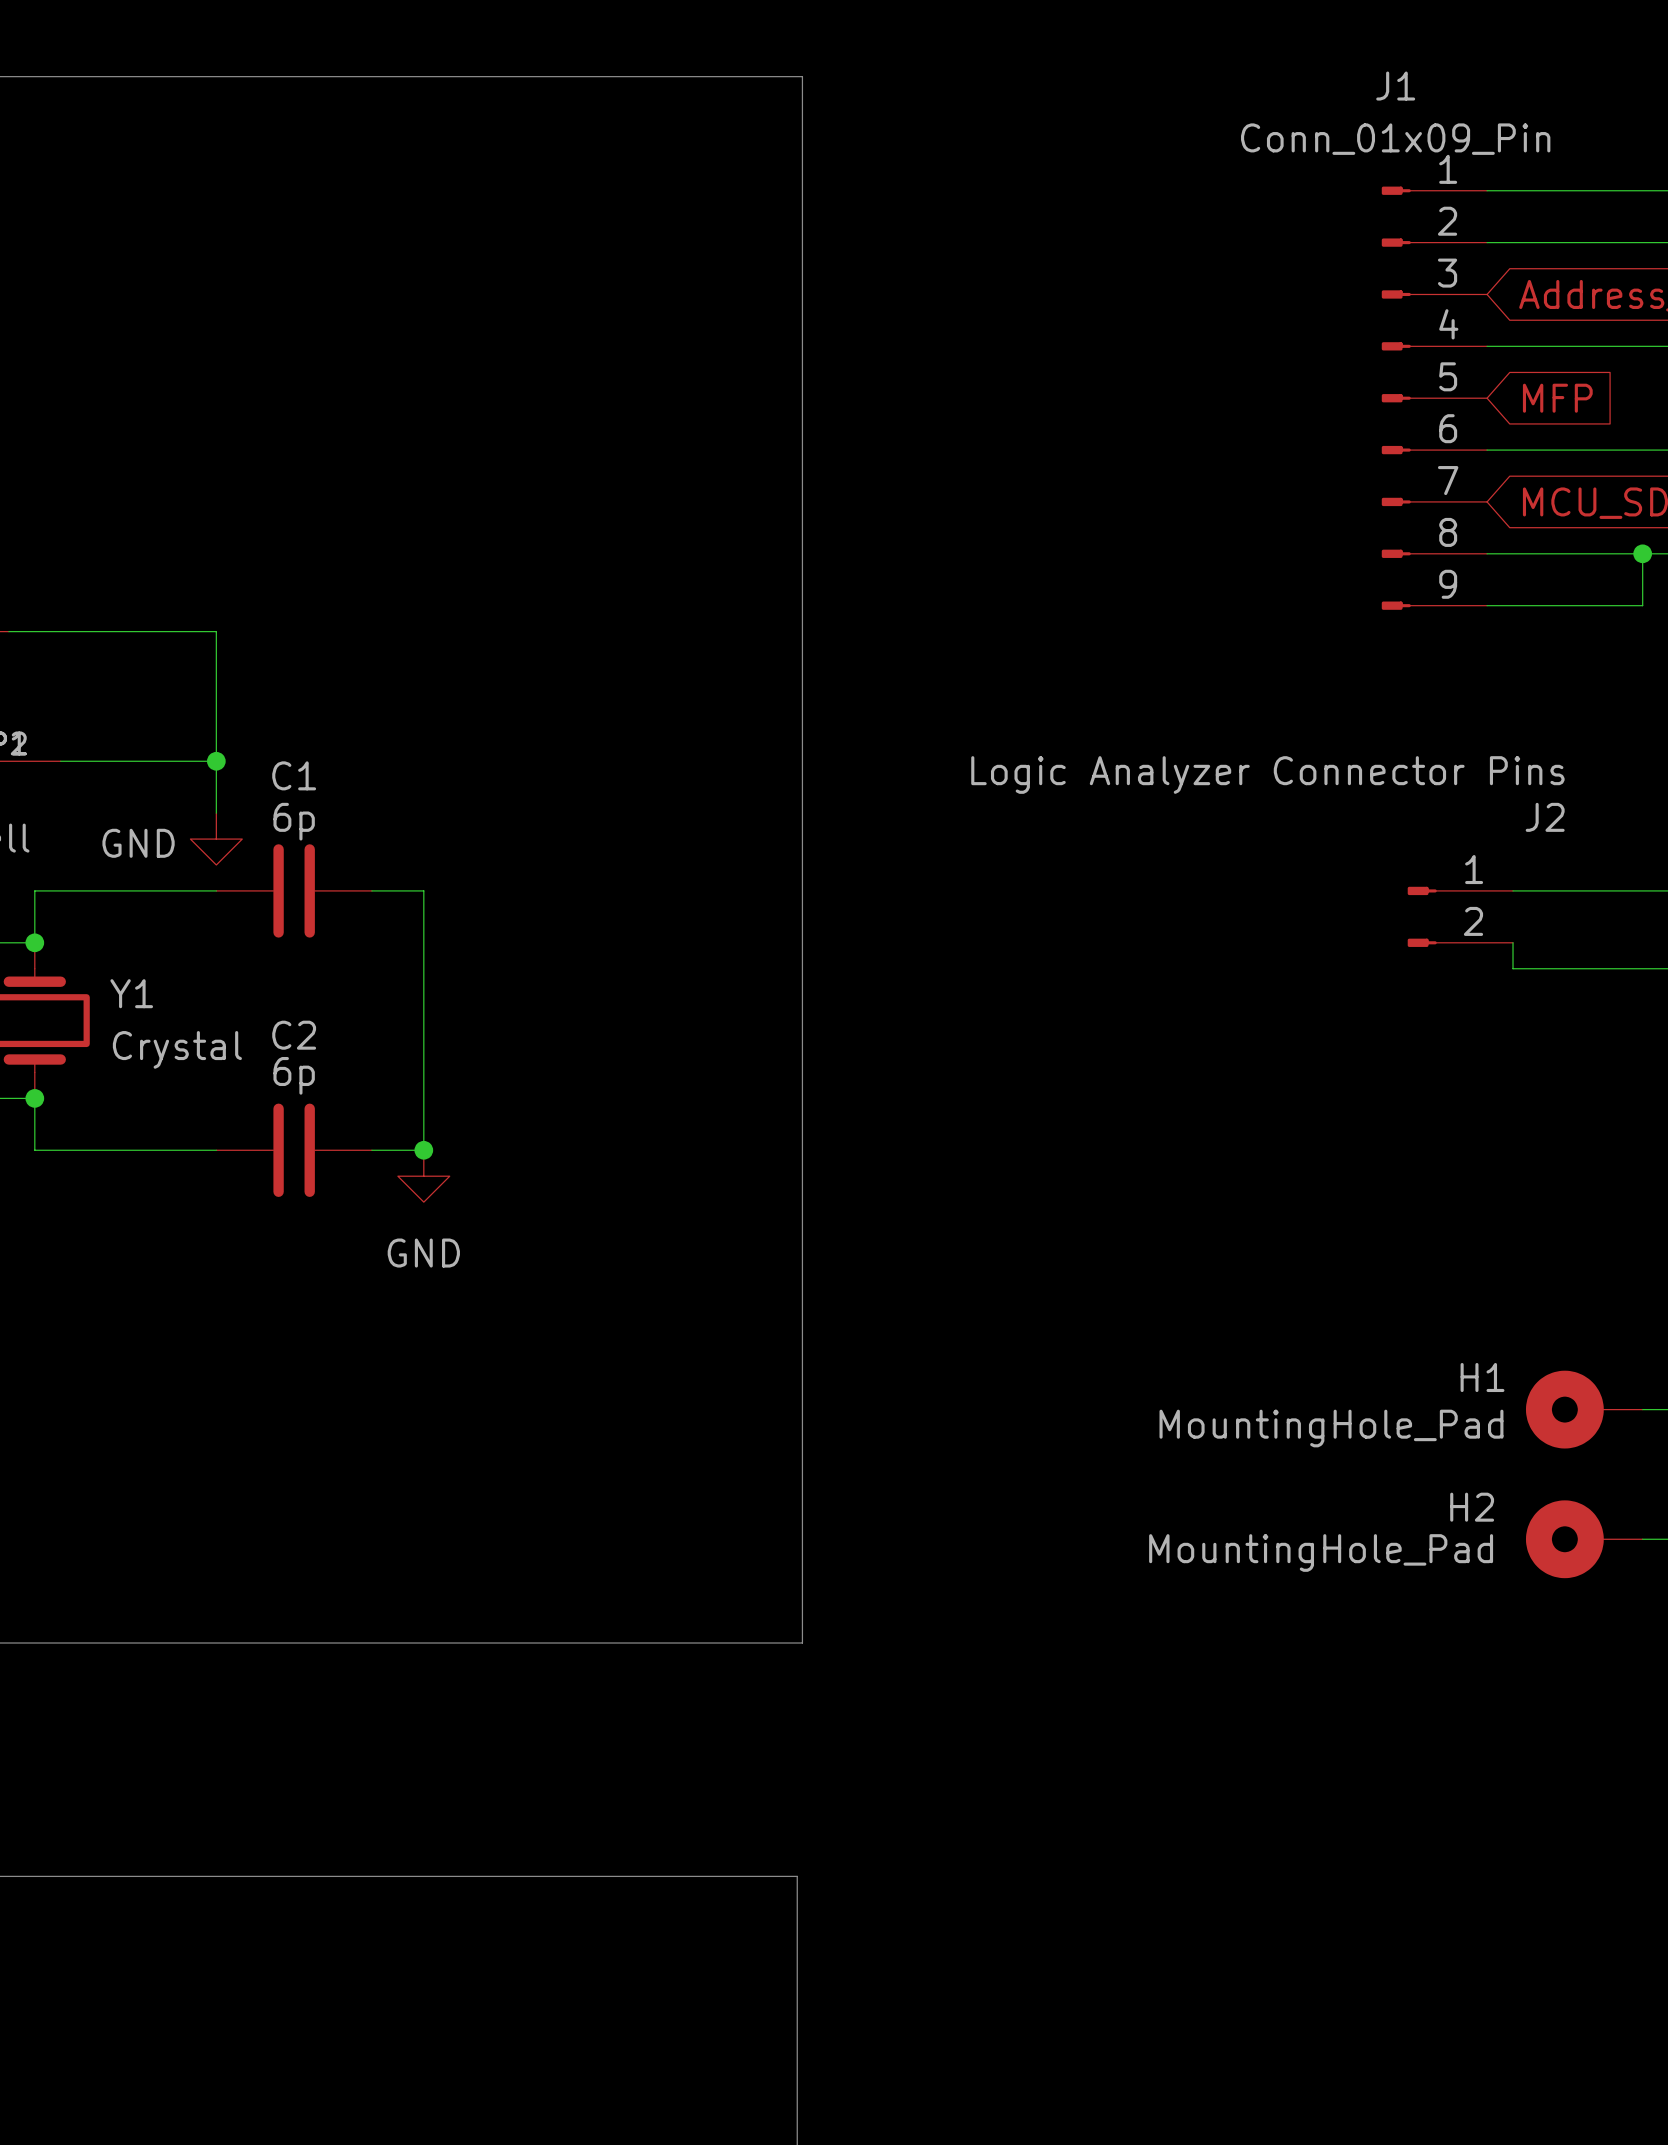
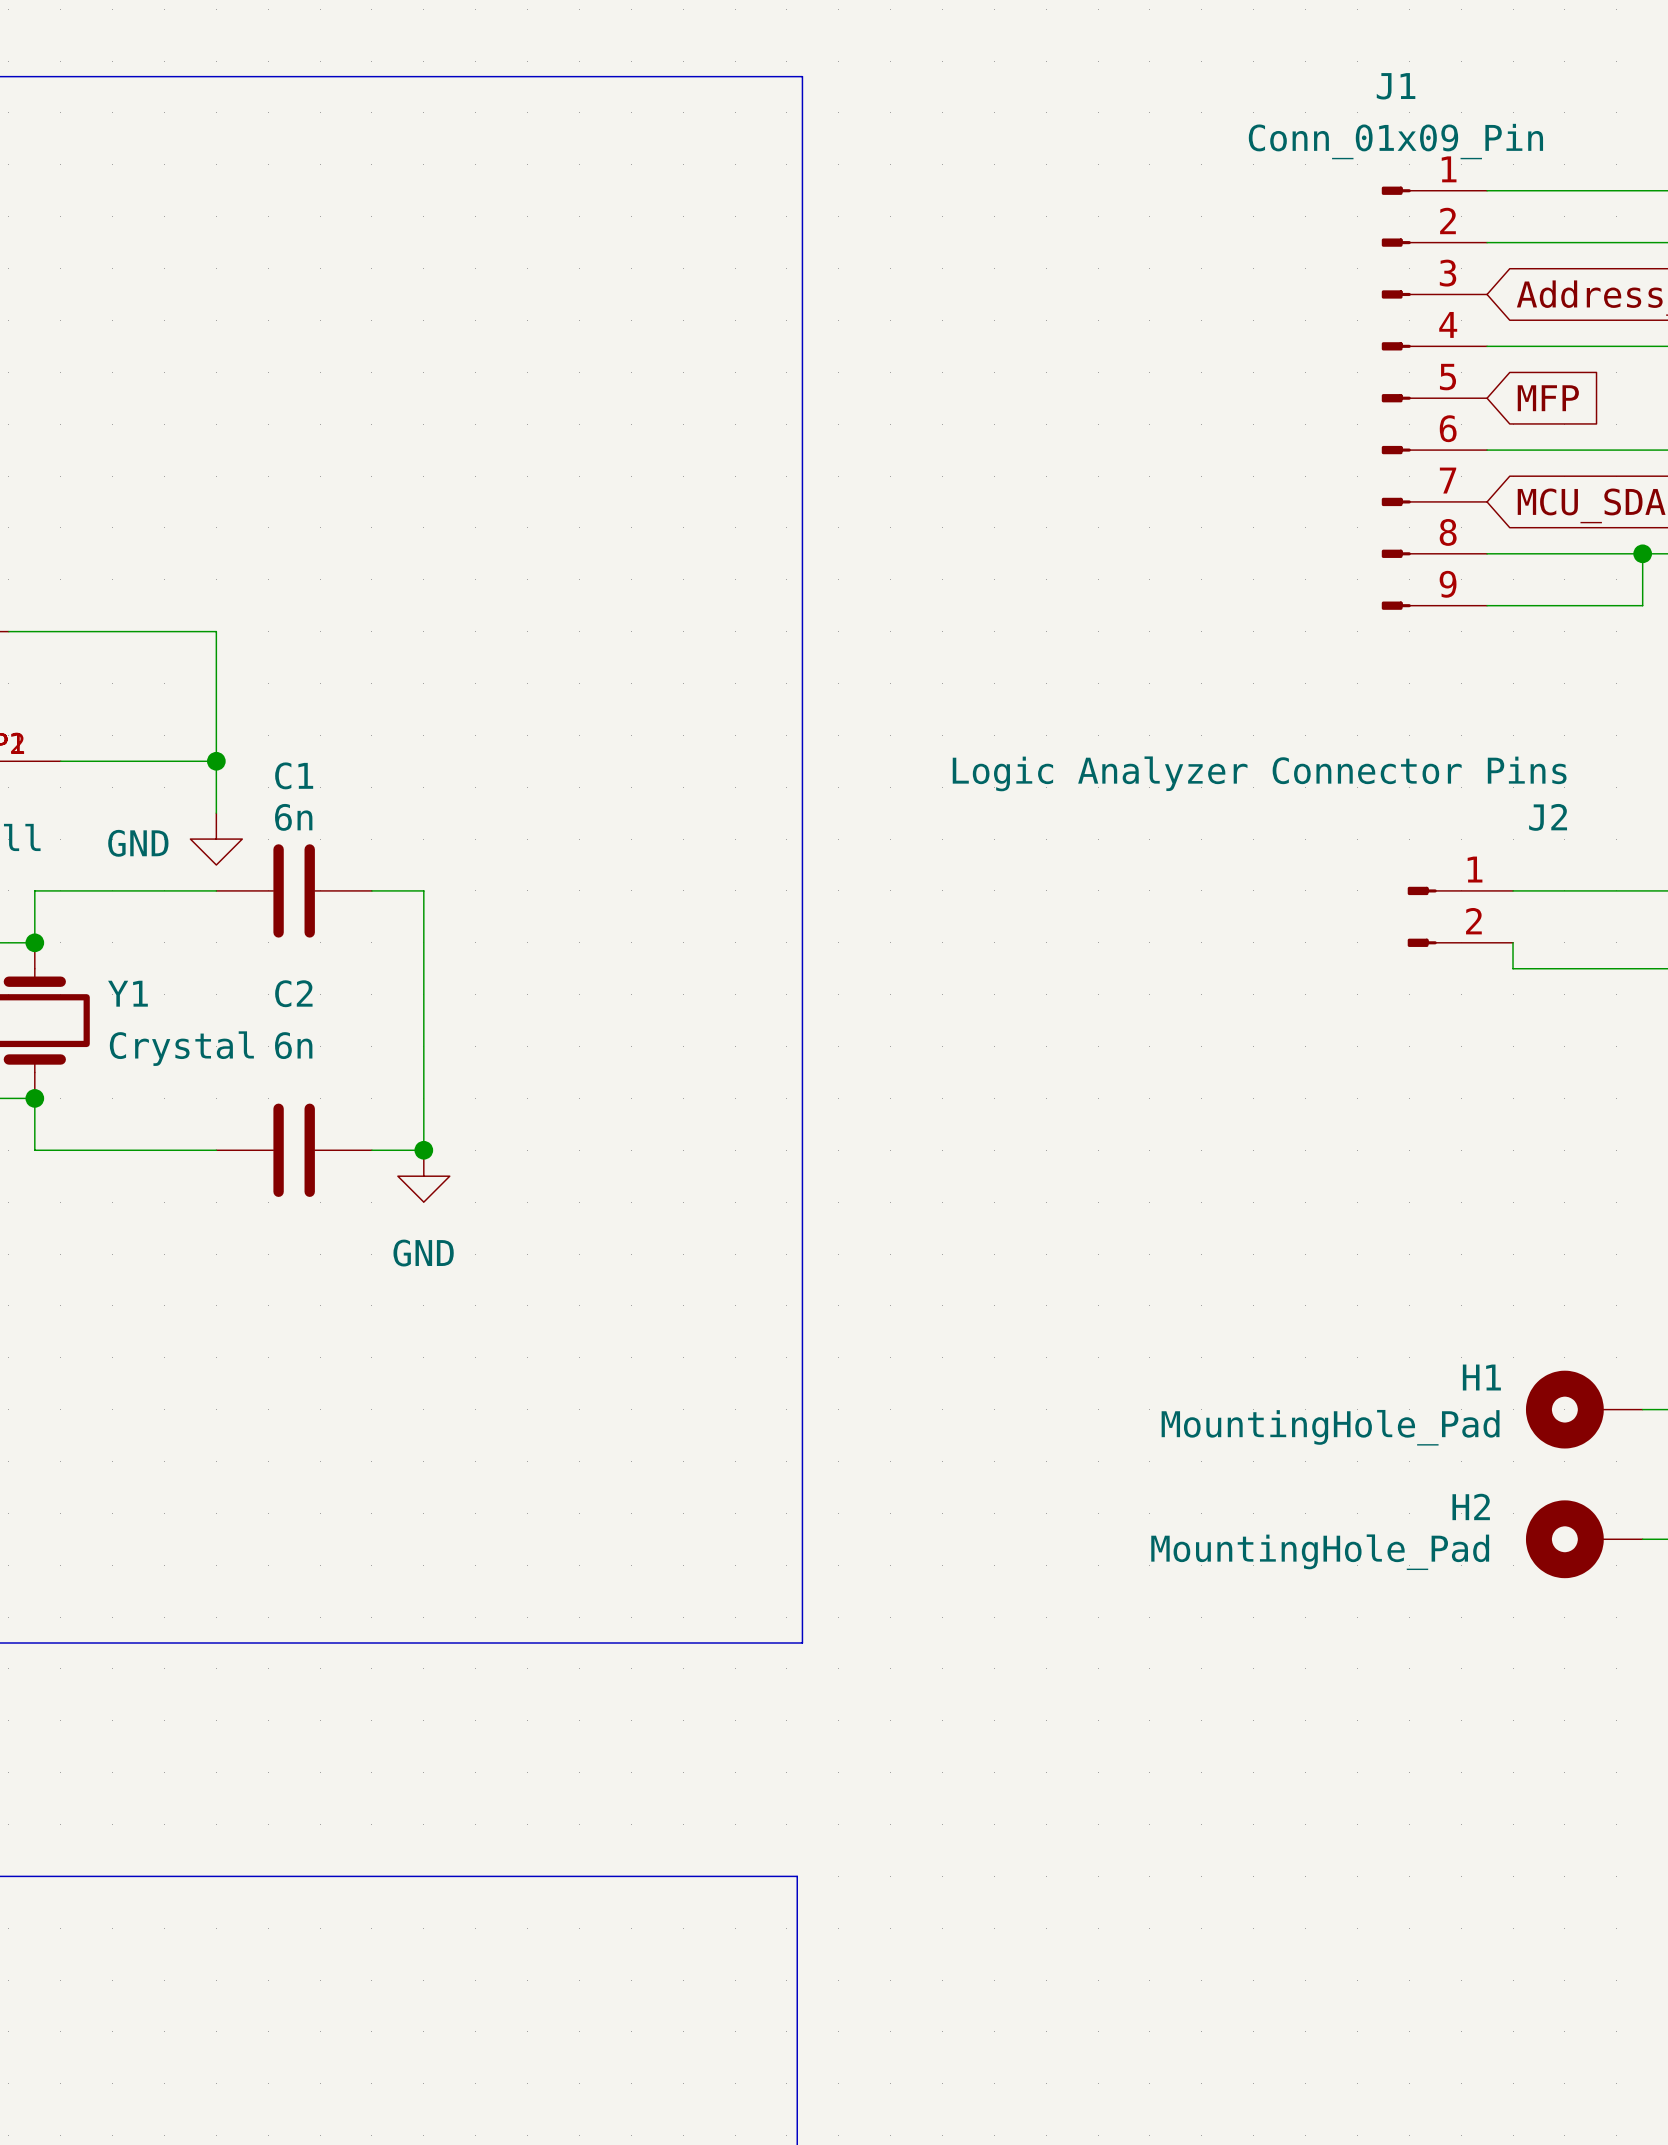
C1 value: 6p (294, 821) -> 6n (293, 817)
C2 name position: C2 (294, 1035) -> C2 (293, 993)
C2 value: 6p (294, 1075) -> 6n (293, 1045)

